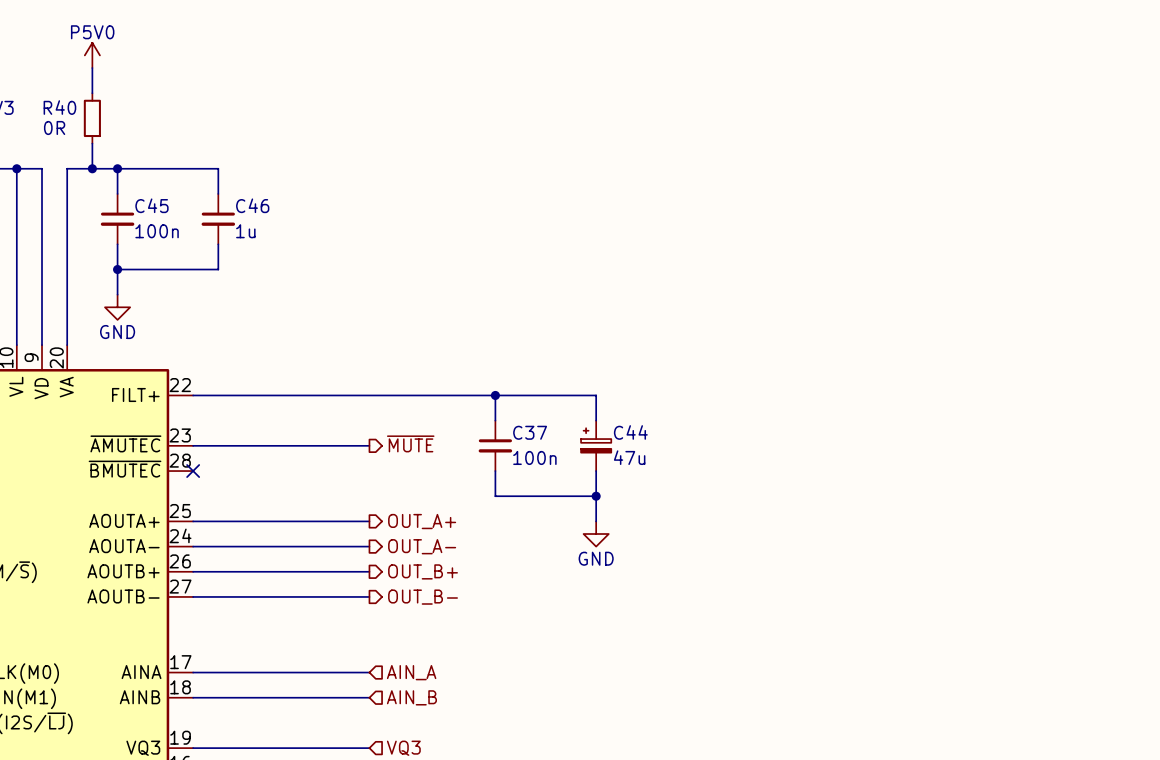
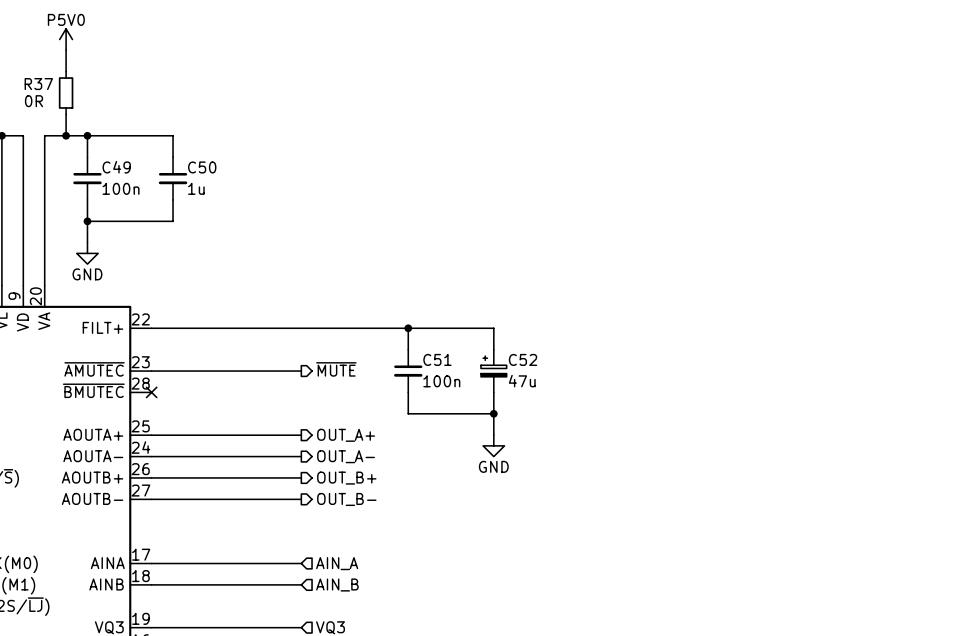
R40 name: R40 (59, 107) -> R37 (38, 84)
C45 name: C45 (151, 205) -> C49 (116, 167)
C46 name: C46 (252, 205) -> C50 (202, 167)
C37 name: C37 (530, 432) -> C51 (437, 359)
C44 name: C44 (630, 432) -> C52 (523, 359)

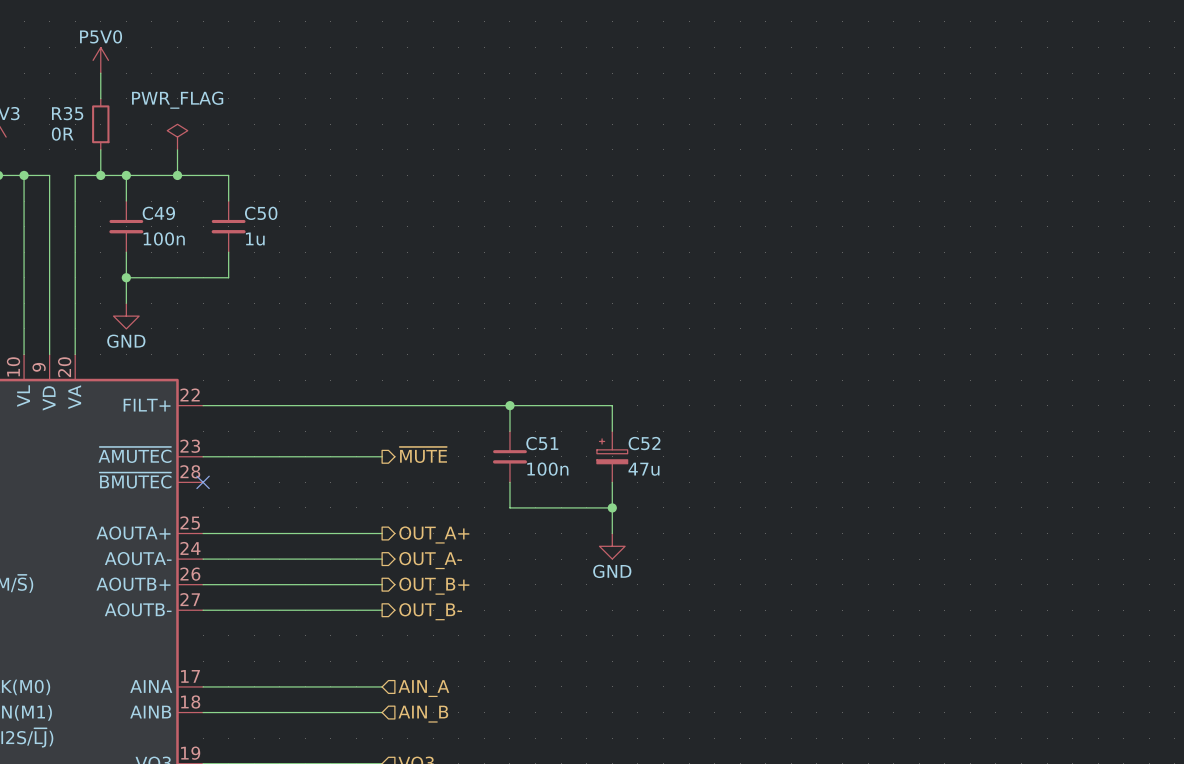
R37 name: R37 (38, 84) -> R35 (67, 113)
power symbol: none -> PWR_FLAG (177, 137)
wire: none -> (177, 149) (177, 175)
junction: none -> (177, 175)

